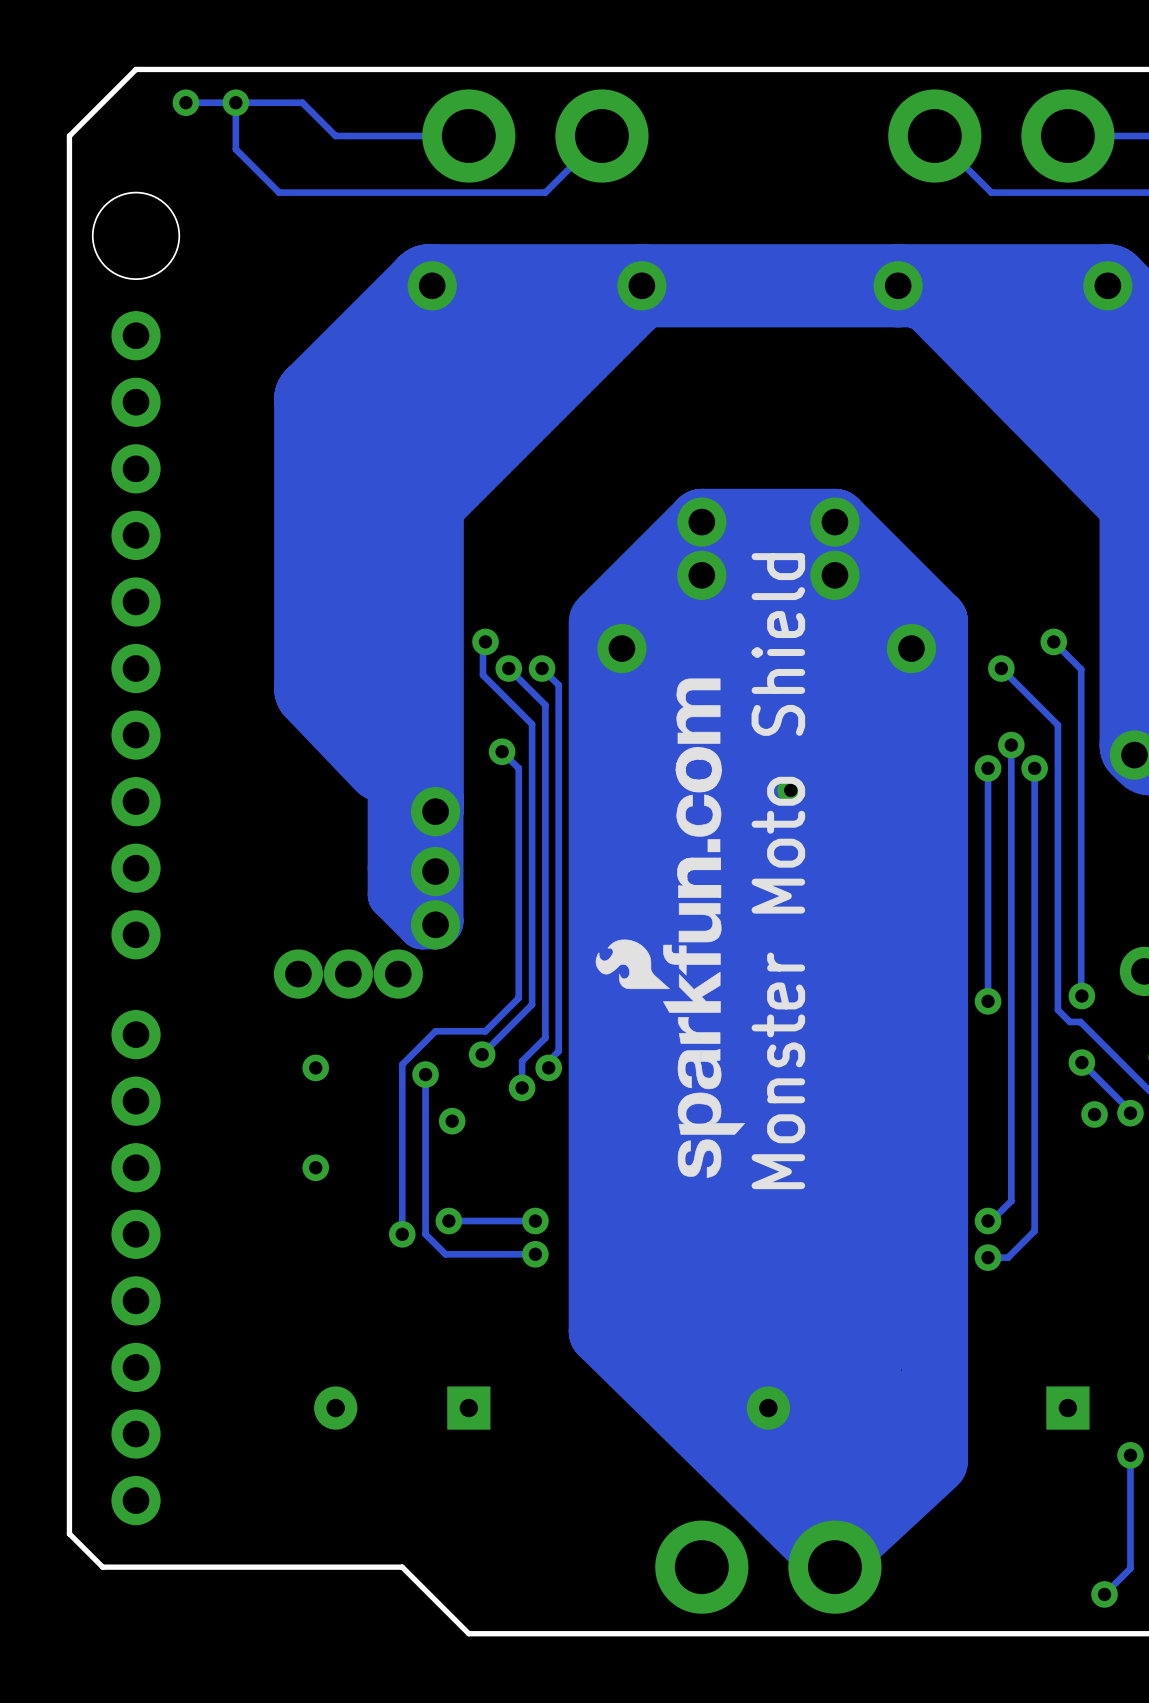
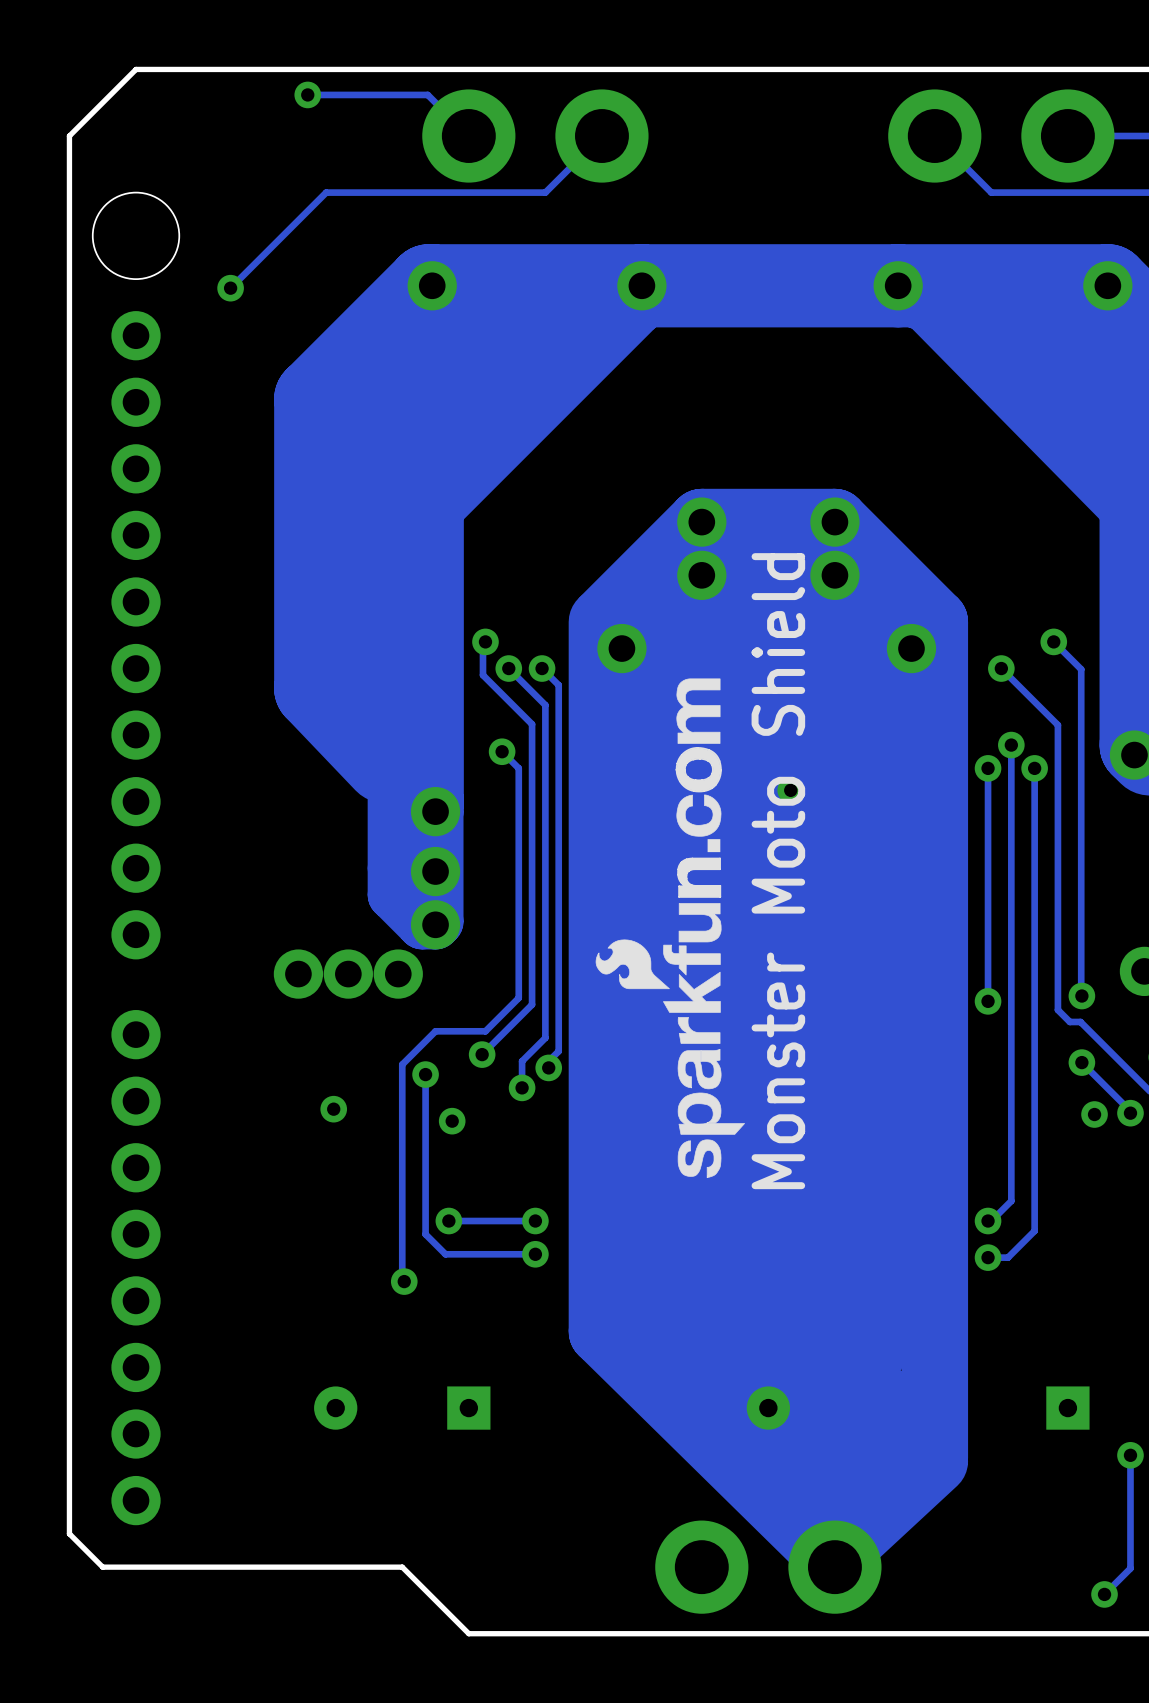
via: none -> (307, 94)
track: (185, 102) (302, 102) (335, 136) (468, 136) -> (307, 94) (427, 94) (468, 136)
via: (185, 102) -> none
track: (235, 102) (235, 149) (279, 192) (326, 192) -> (230, 288) (326, 192)
via: (235, 102) -> none
via: none -> (230, 288)
via: (315, 1067) -> none
via: none -> (333, 1109)
via: (315, 1167) -> none
track: none -> (402, 1234) (402, 1279) (404, 1281)
via position: (402, 1234) -> (404, 1281)

